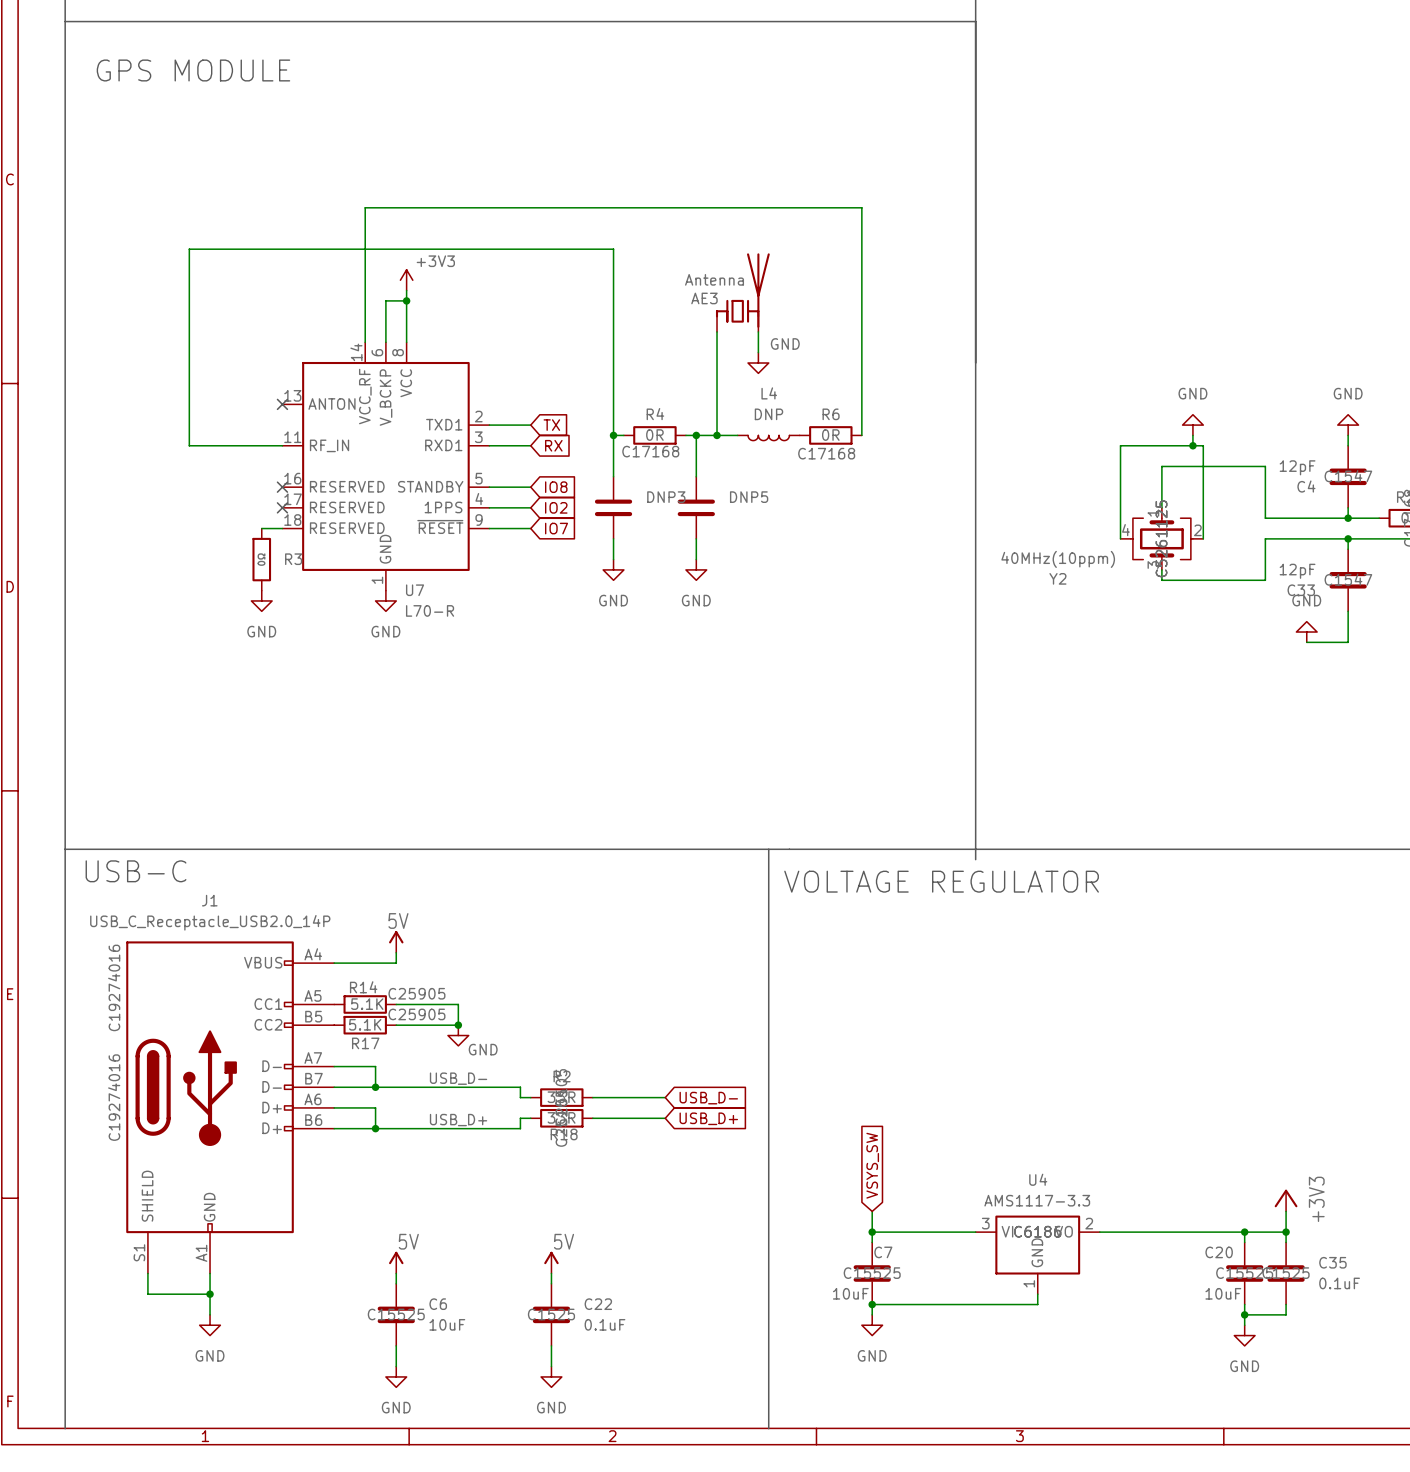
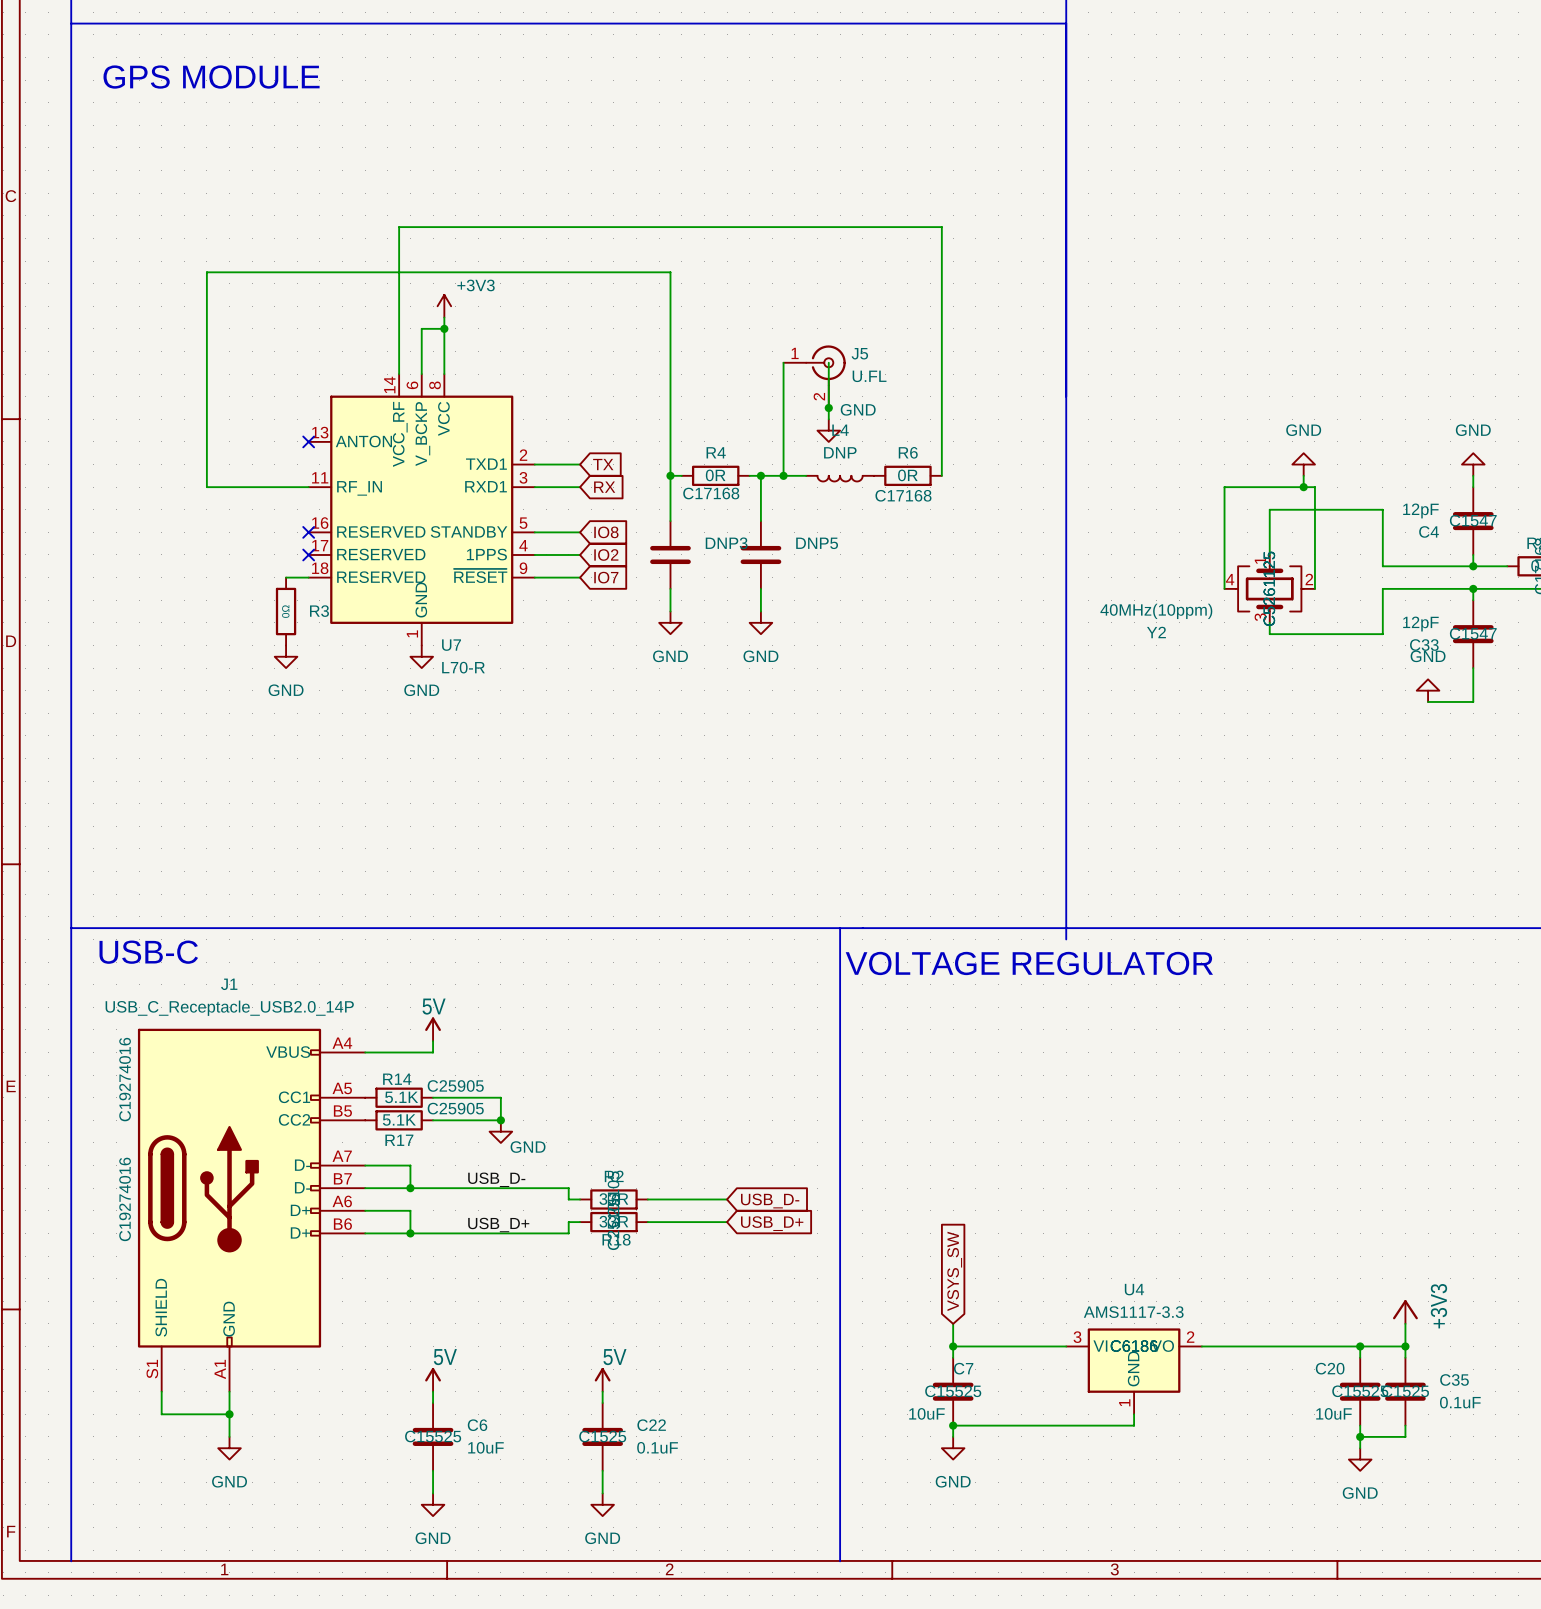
AE3: Antenna (742, 292) -> none
J5: none -> U.FL (814, 376)
wire: none -> (828, 385) (828, 419)
power symbol position: GND (758, 363) -> GND (828, 430)
junction: none -> (828, 408)

